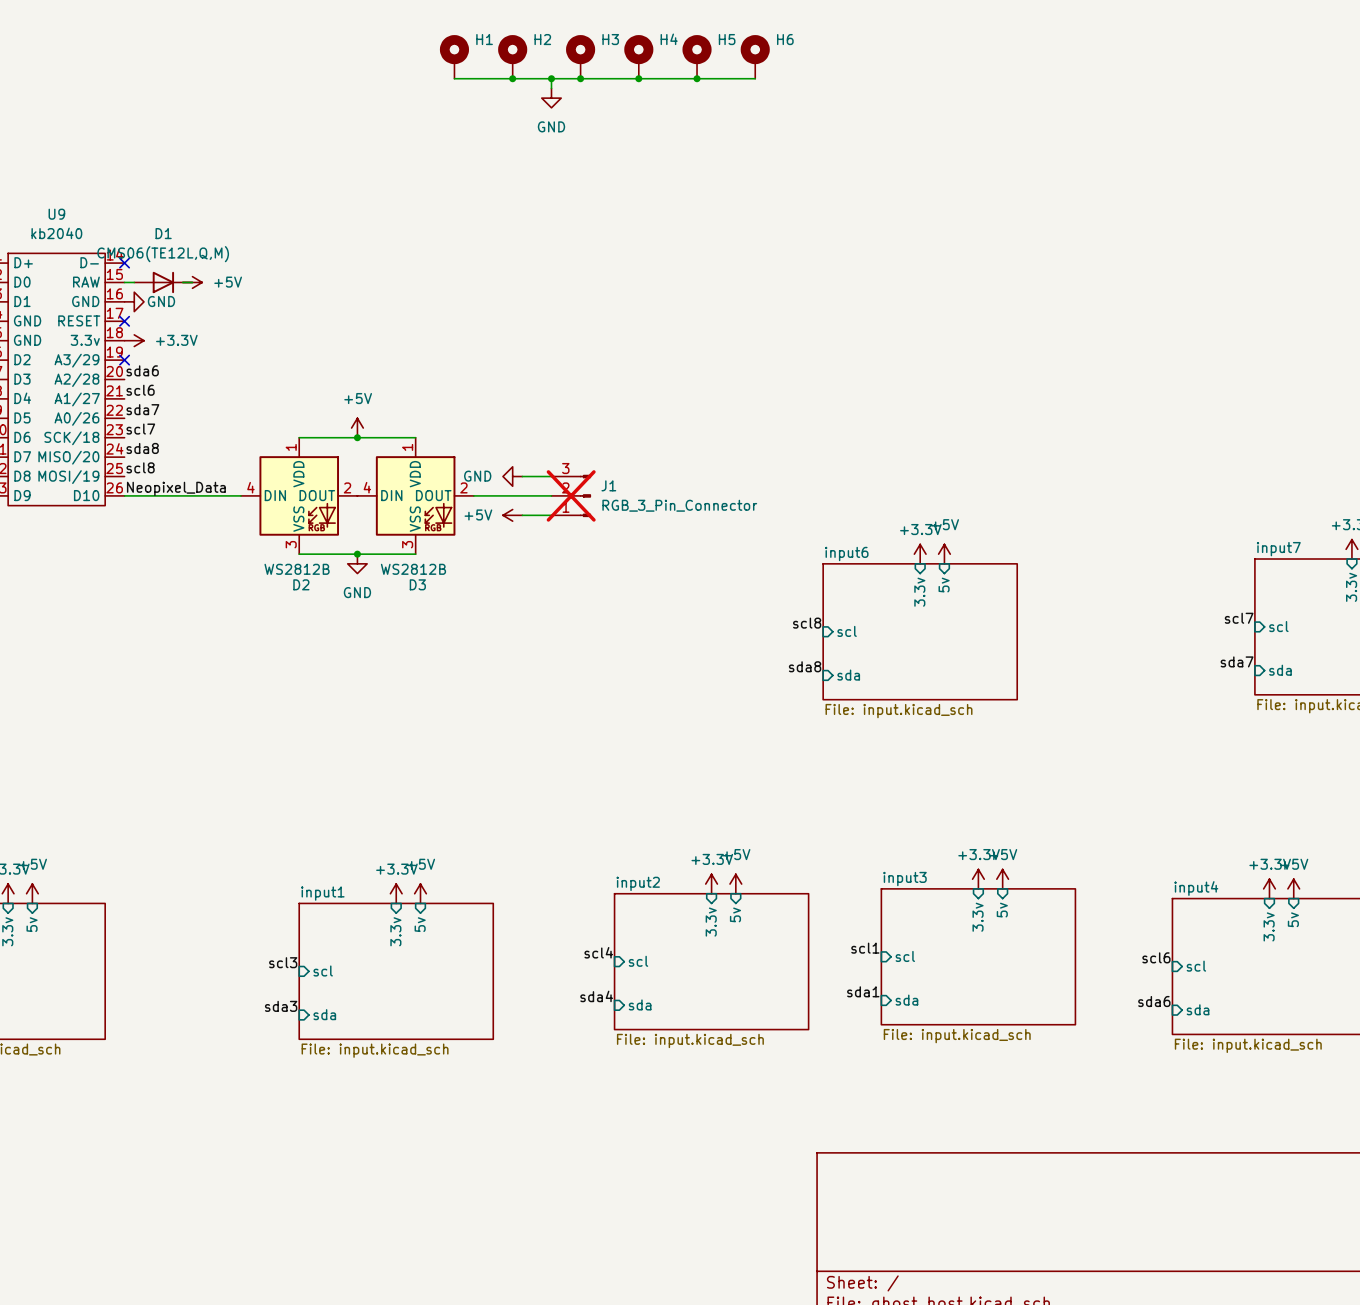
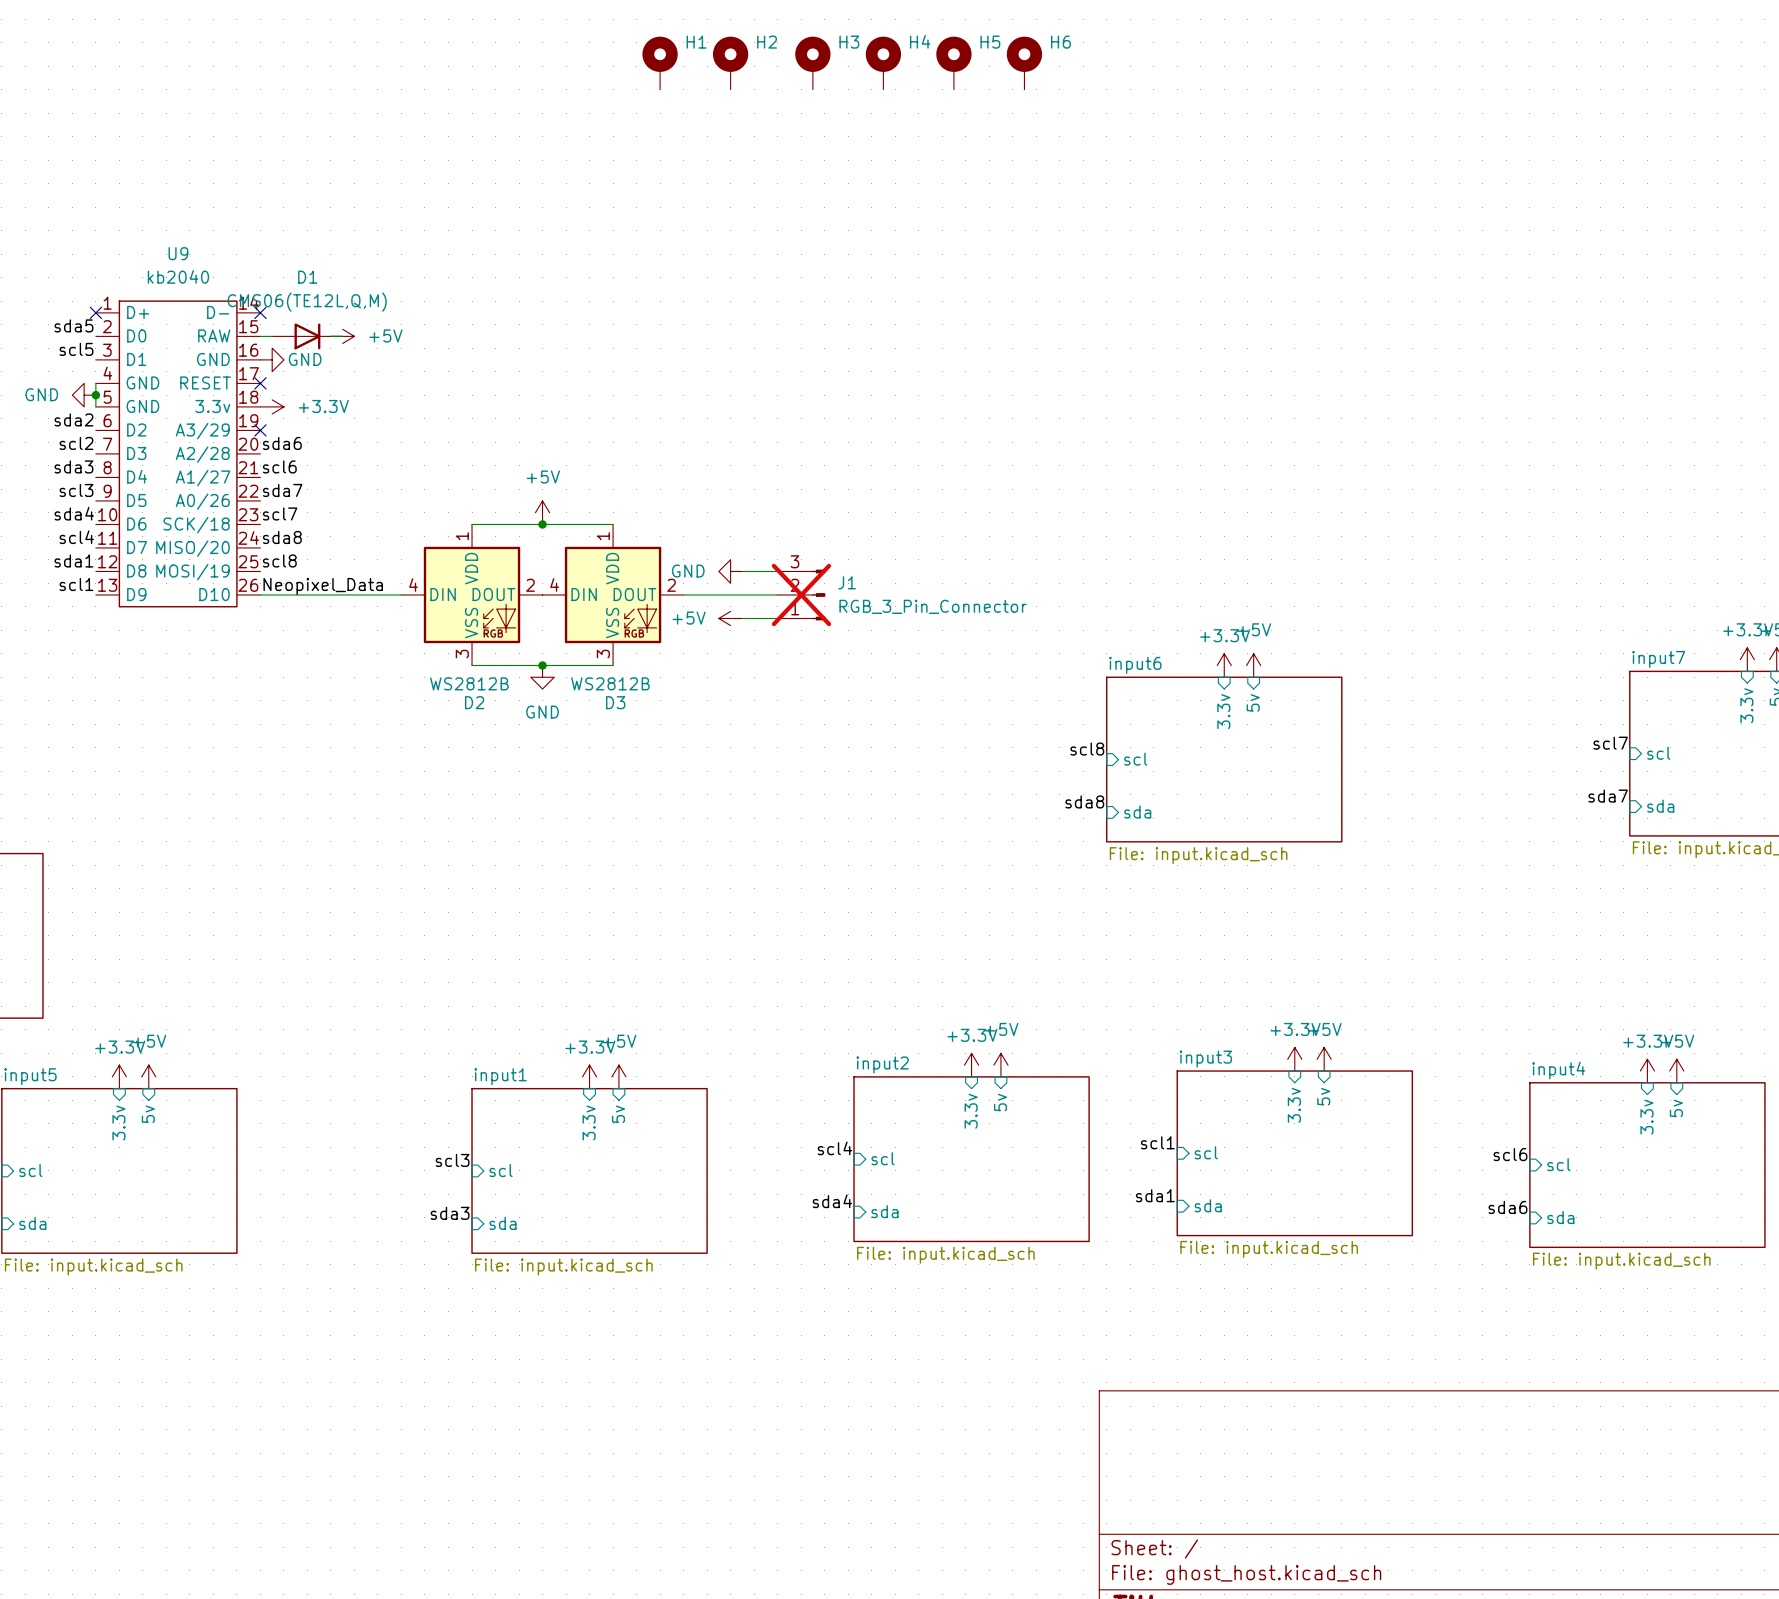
wire: (454, 78) (755, 78) -> none
junction: (512, 78) -> none
wire: (551, 78) (551, 88) -> none
junction: (551, 78) -> none
junction: (580, 78) -> none
junction: (638, 78) -> none
junction: (697, 78) -> none
power symbol: GND (551, 98) -> none

